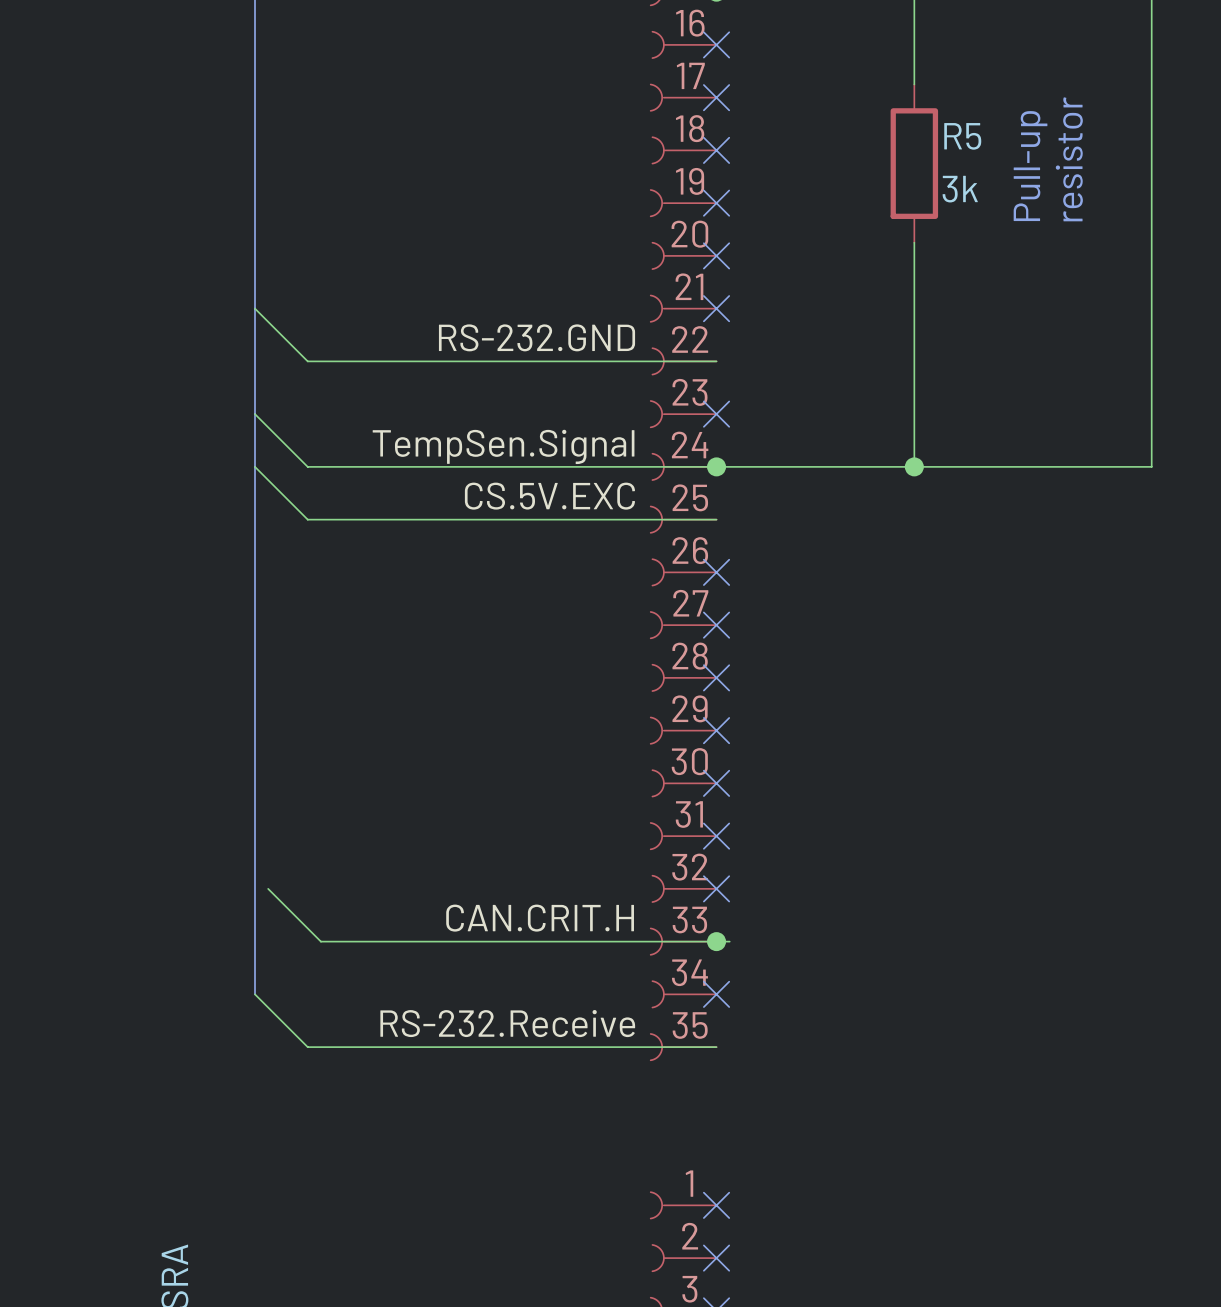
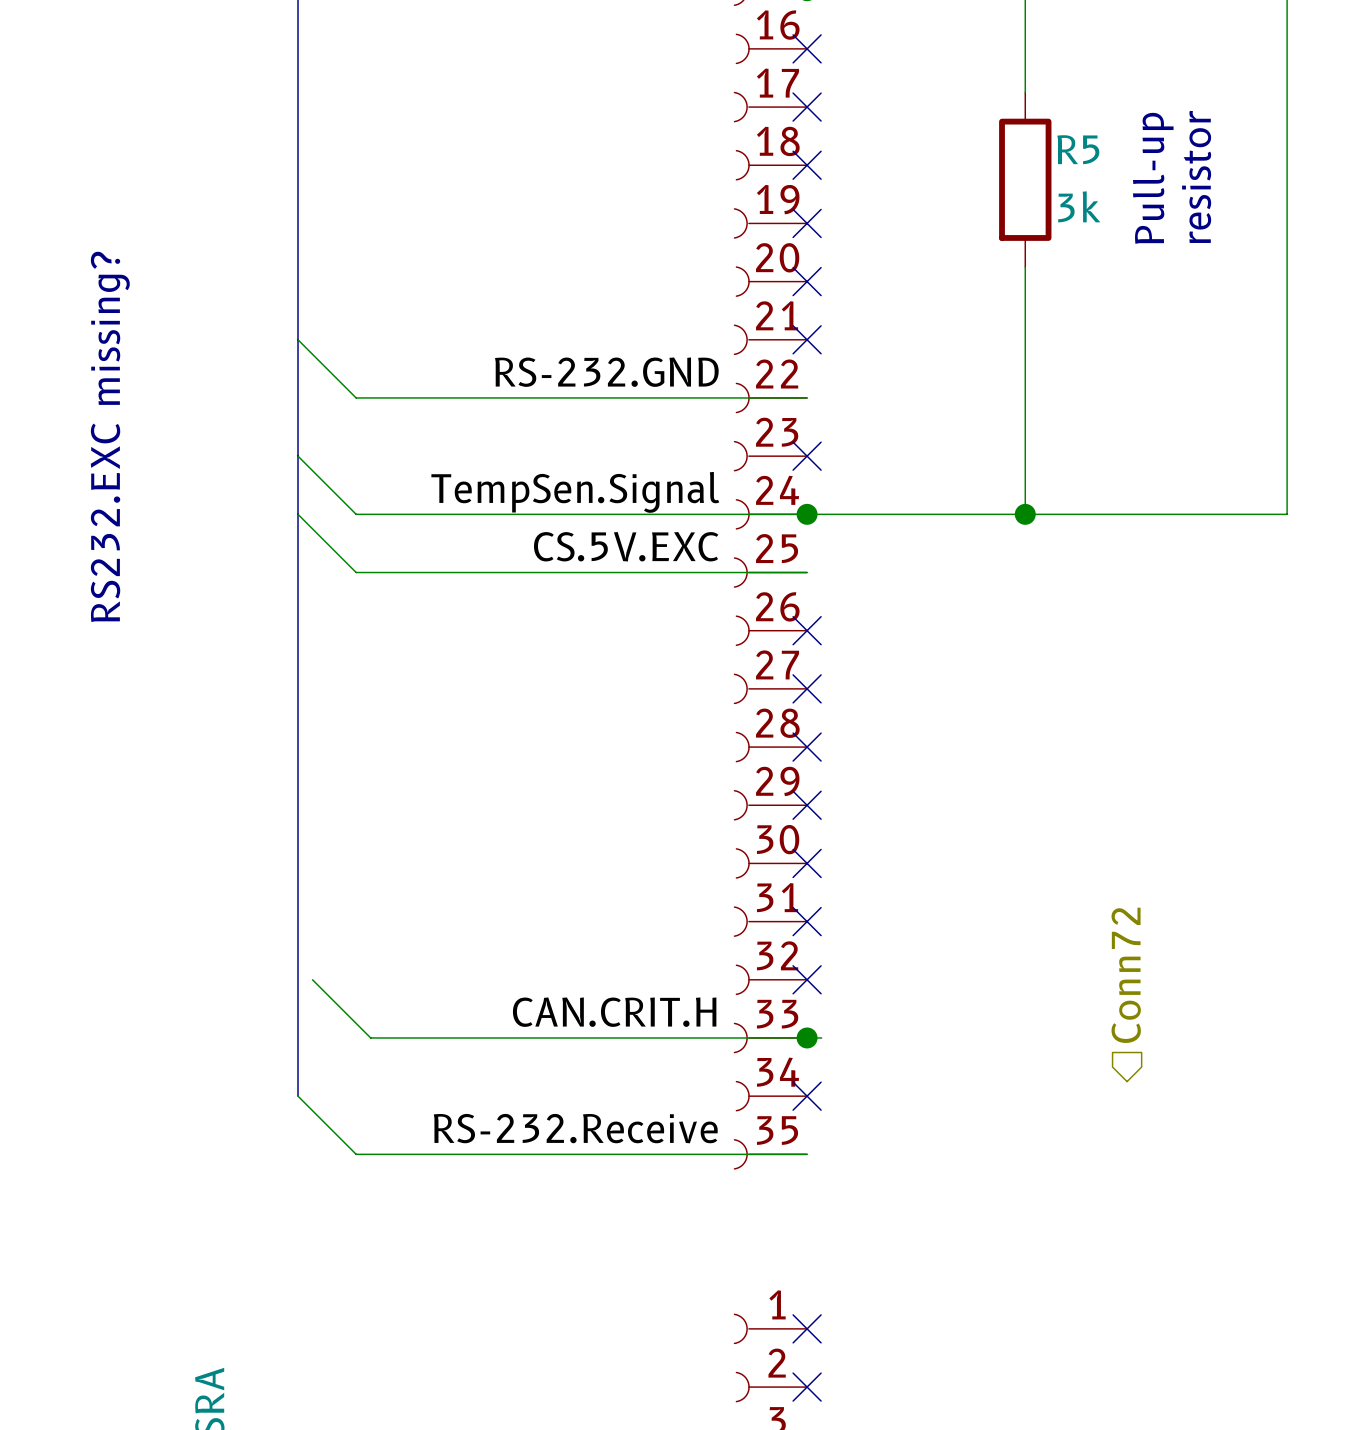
text: none -> RS232.EXC missing? (110, 436)
hierarchical label: none -> Conn72 (1126, 975)

